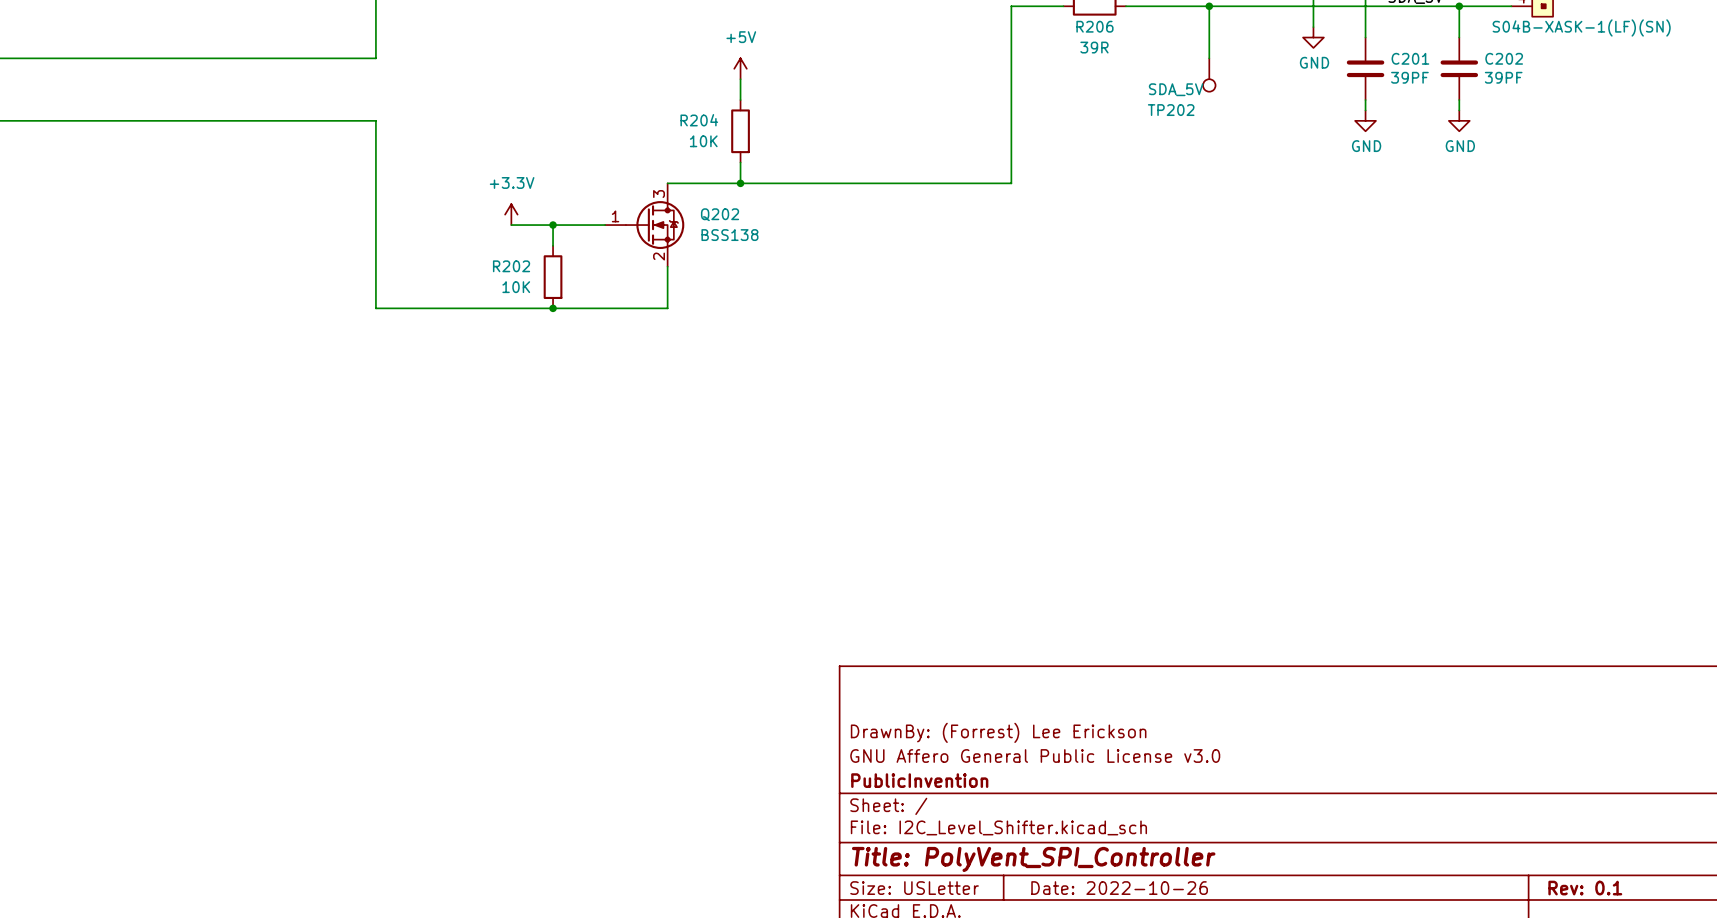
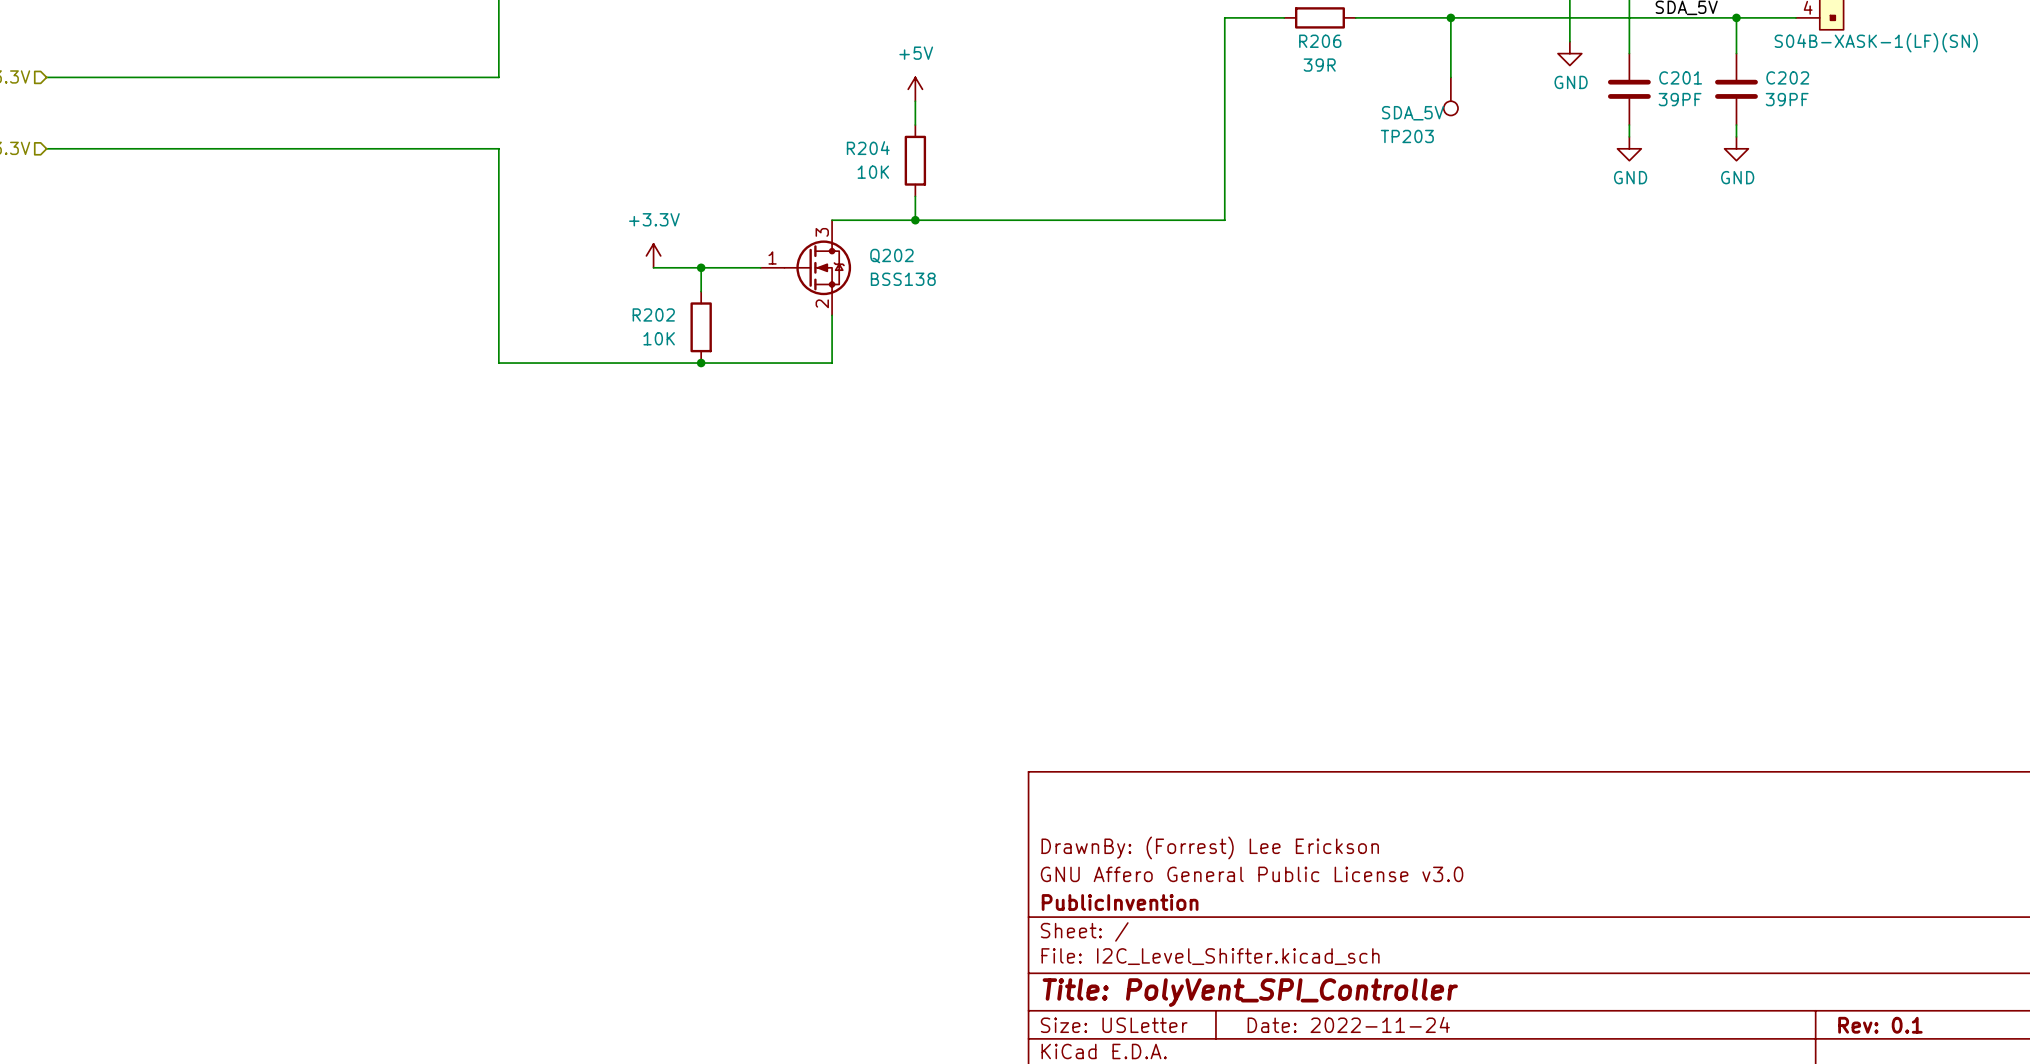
TP202 name: TP202 (1171, 110) -> TP203 (1407, 136)
title block: Date: 2022-10-26 (1119, 888) -> Date: 2022-11-24 (1348, 1024)

